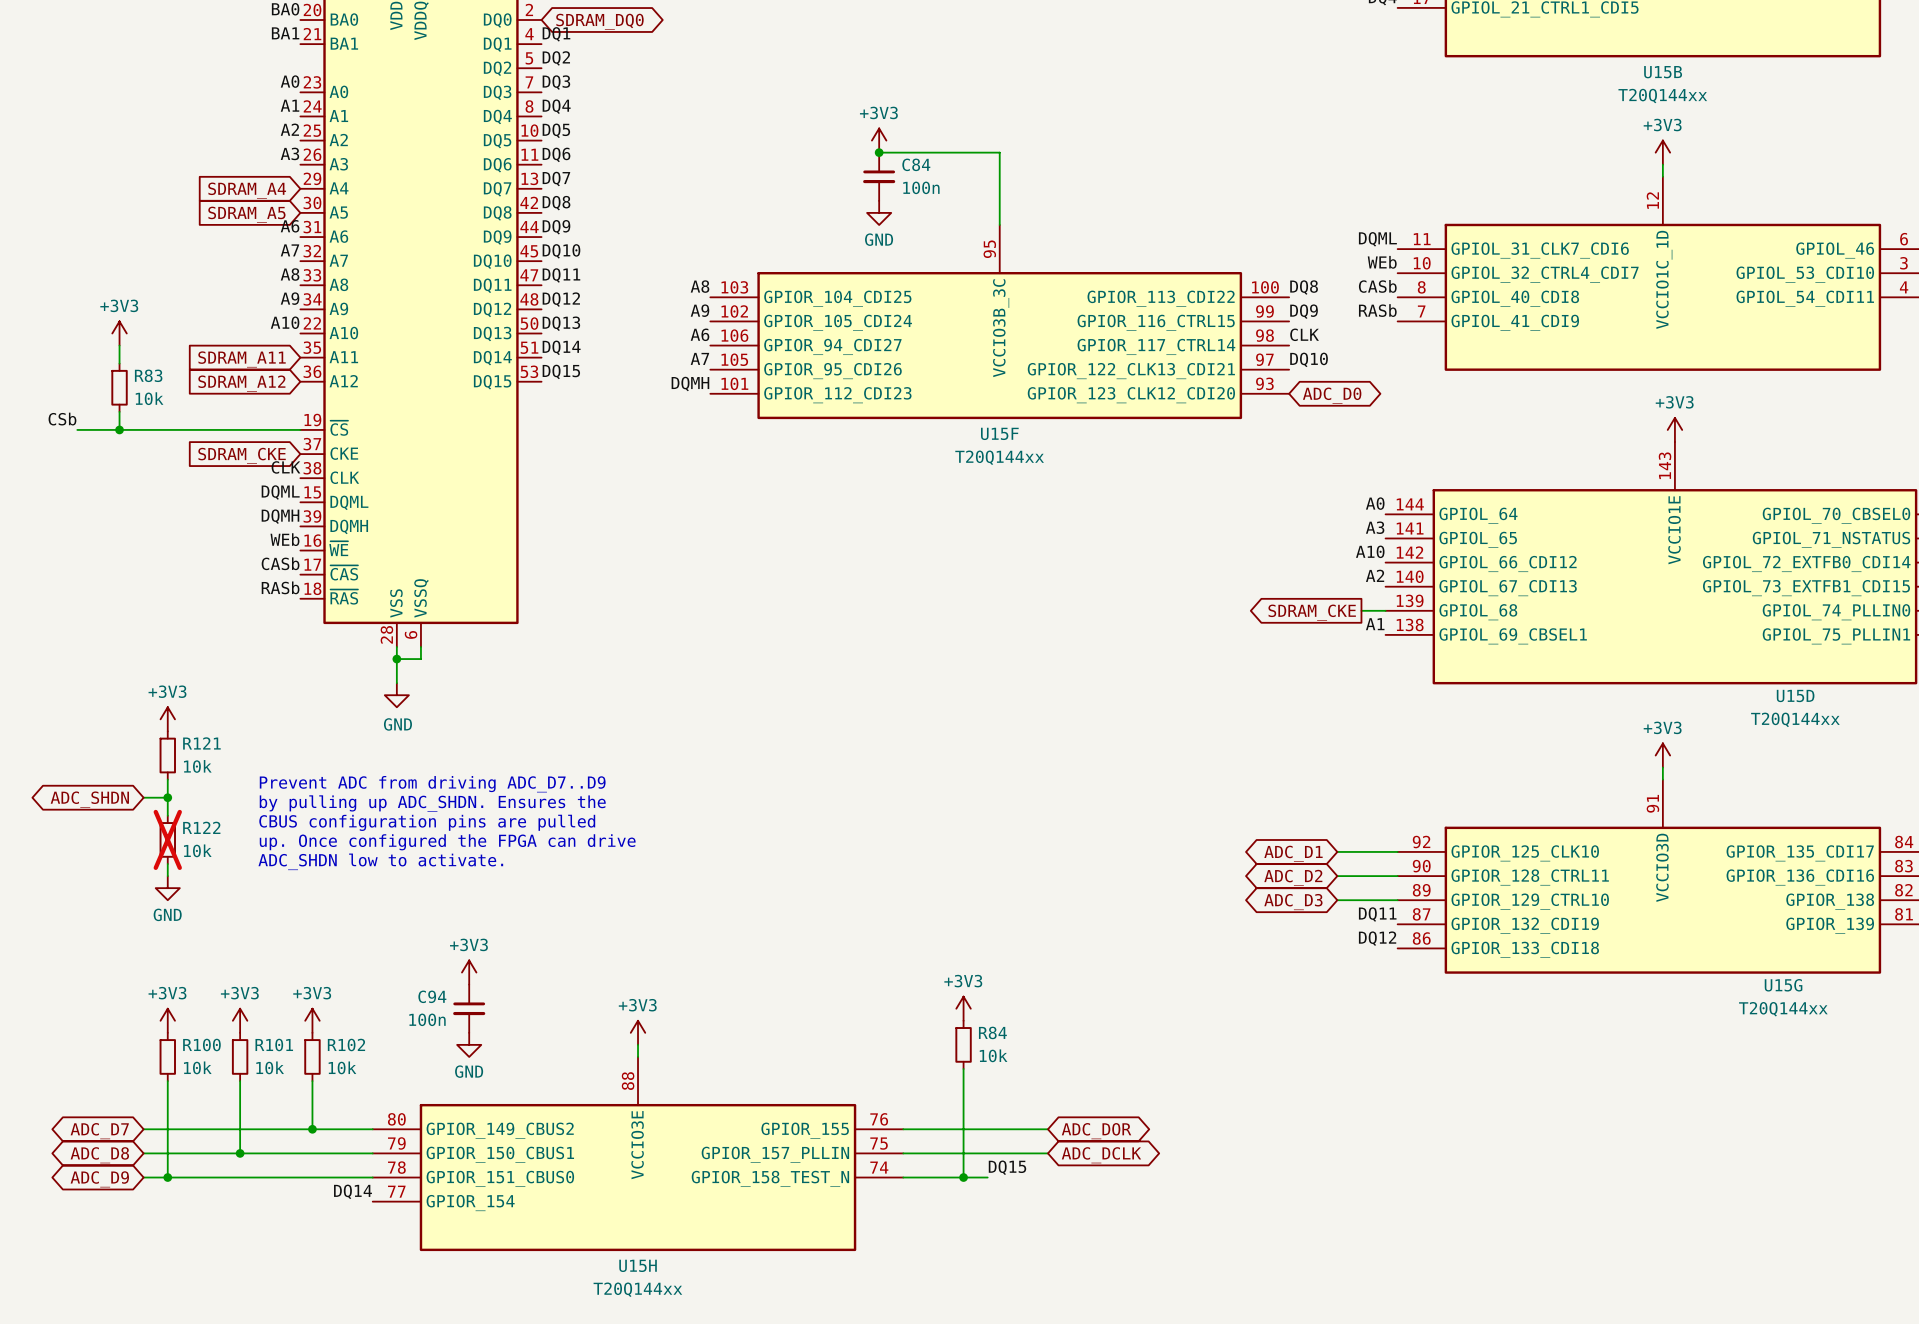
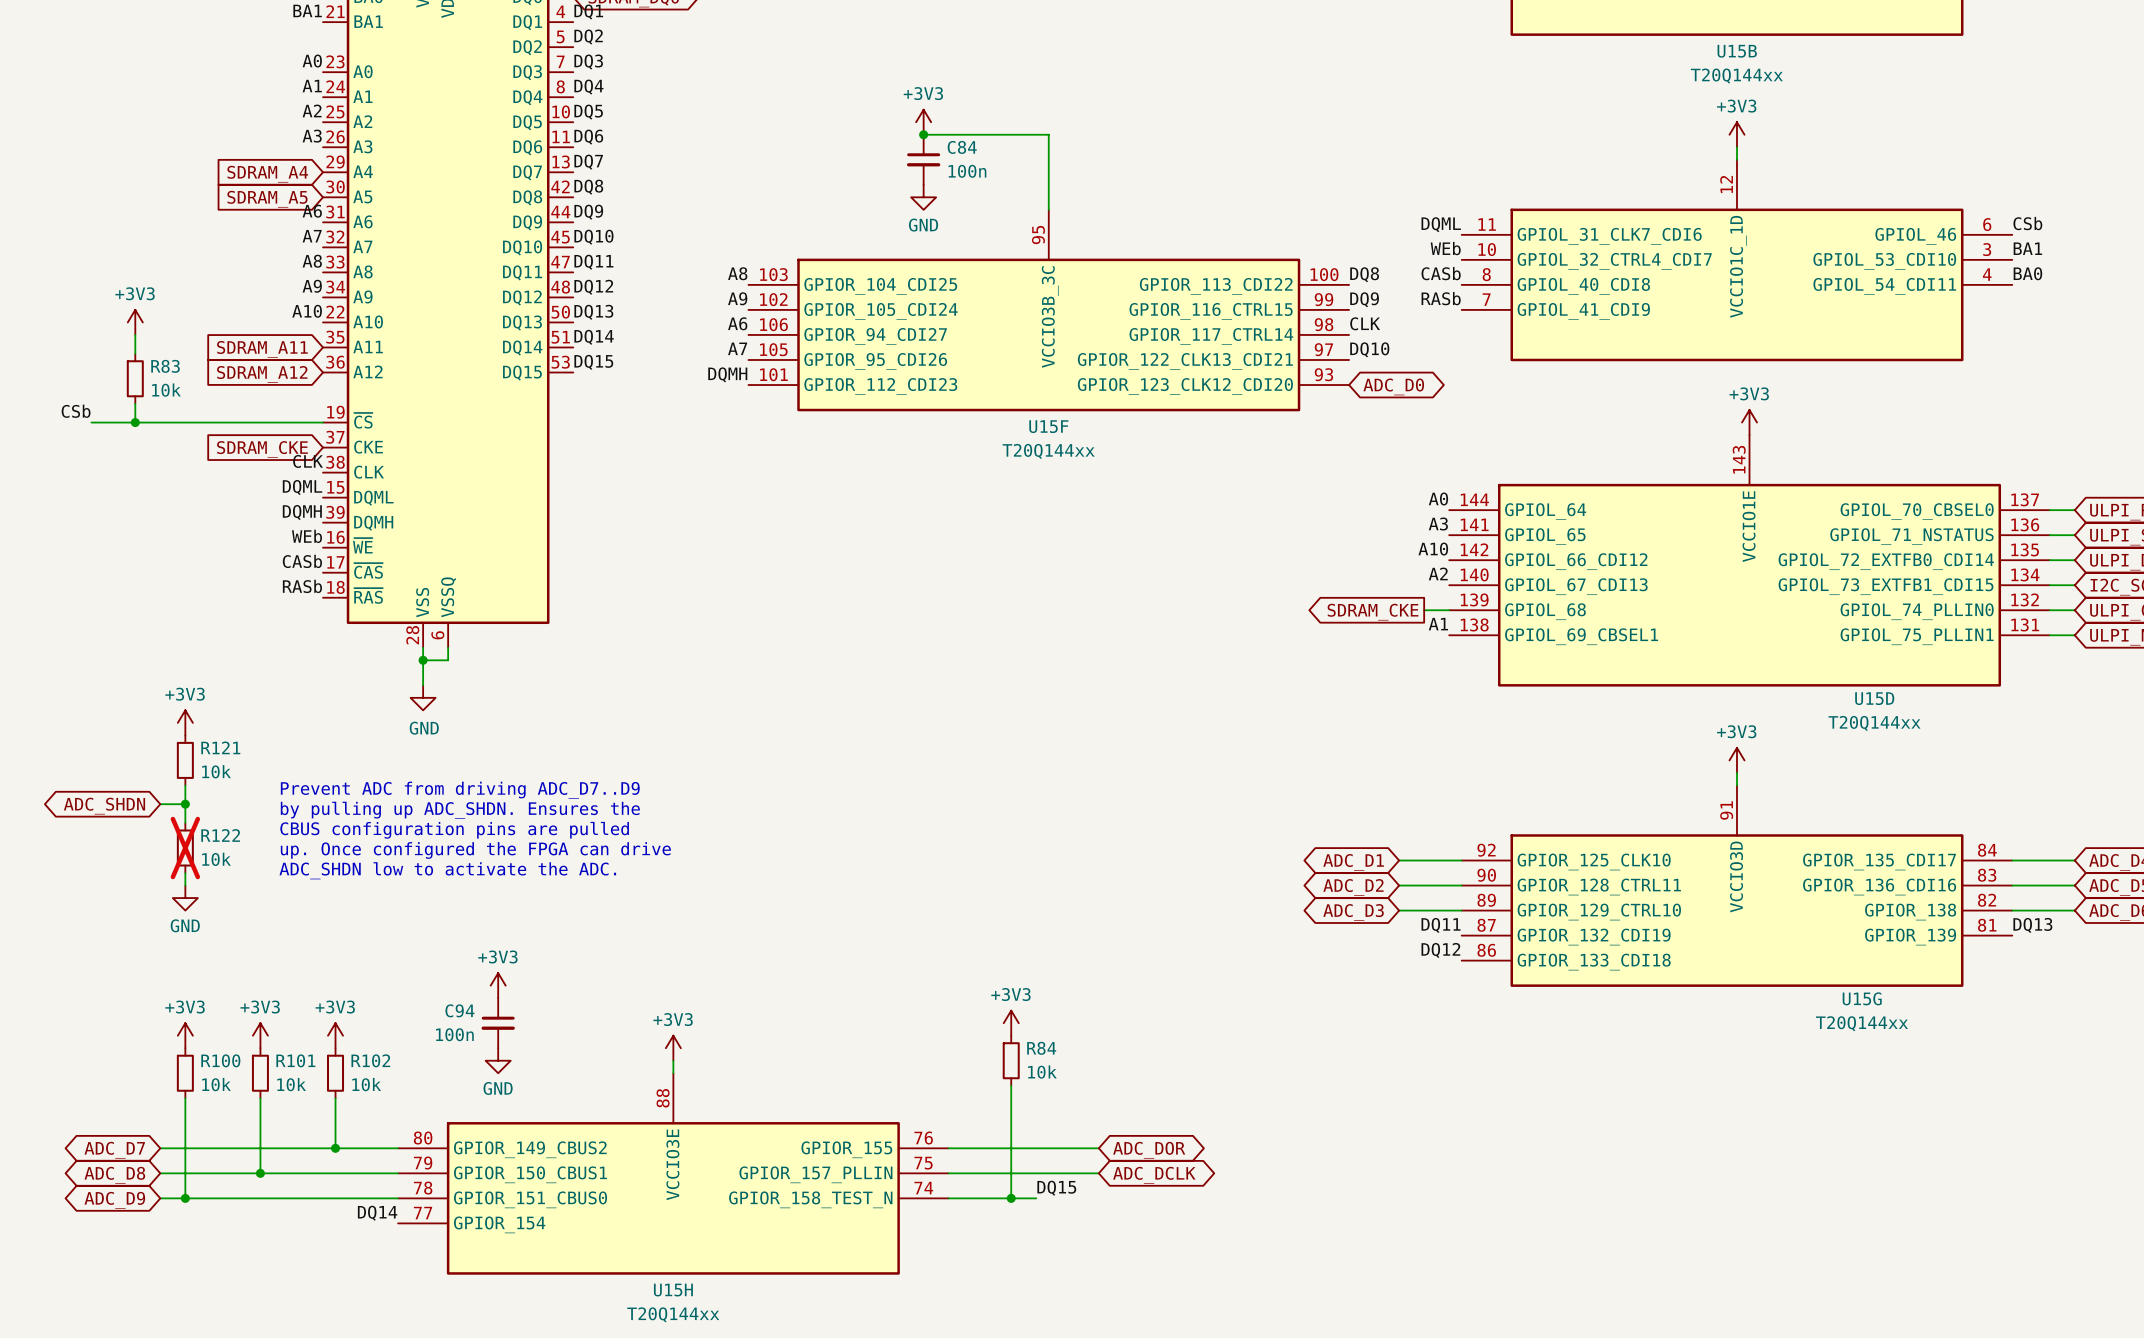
text: ADC_SHDN low to activate. (380, 861) -> ADC_SHDN low to activate the ADC. (447, 870)

